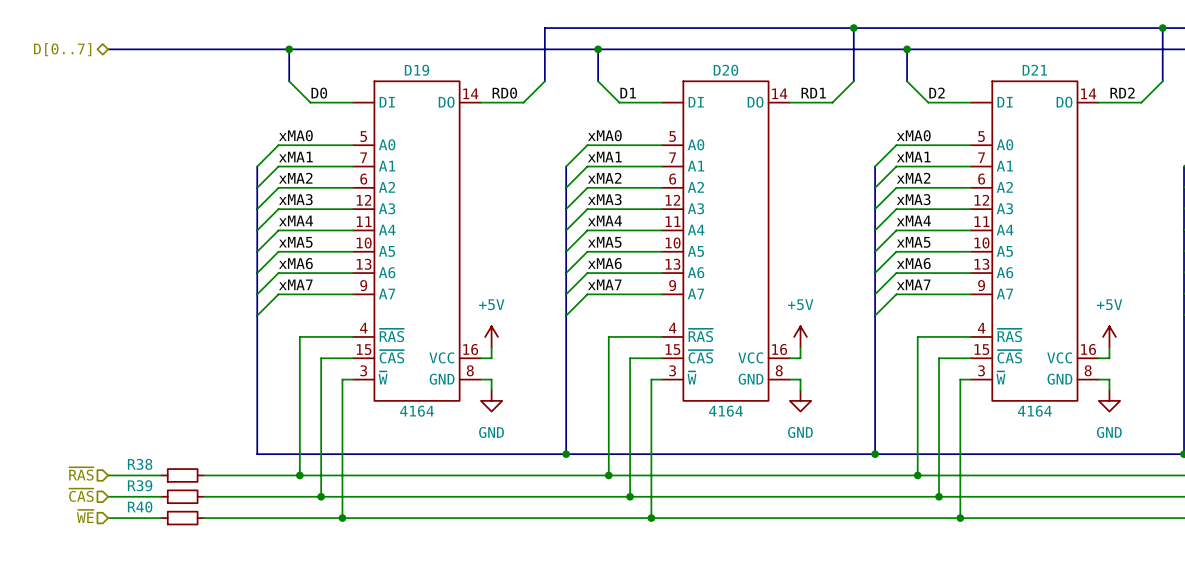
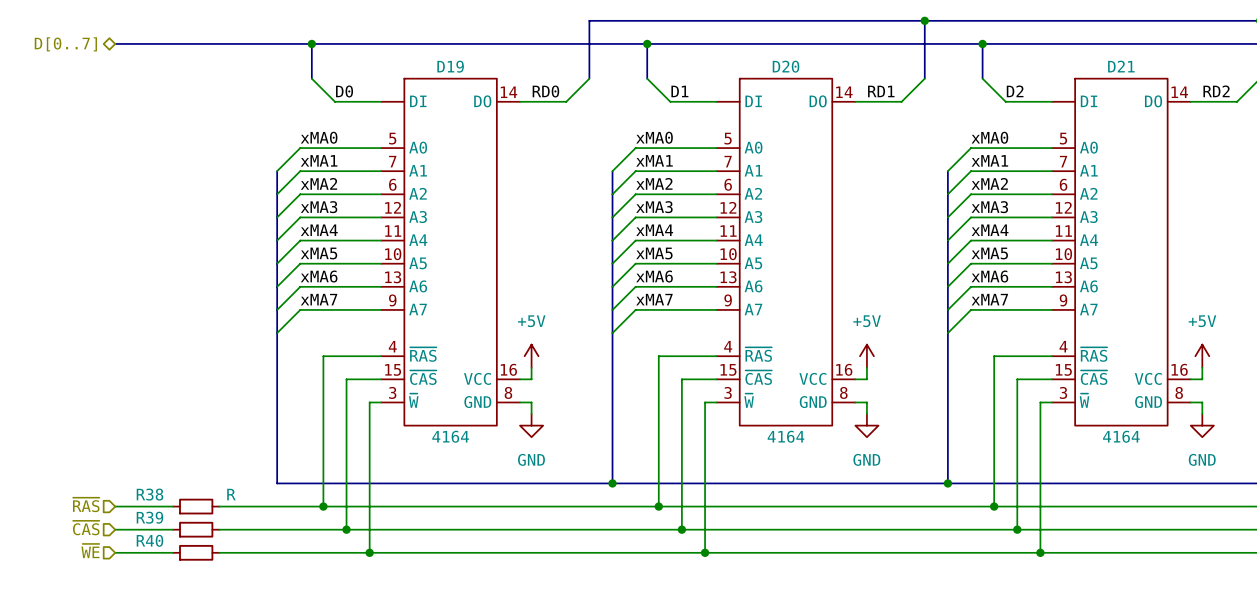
R38 value: none -> R (231, 494)

